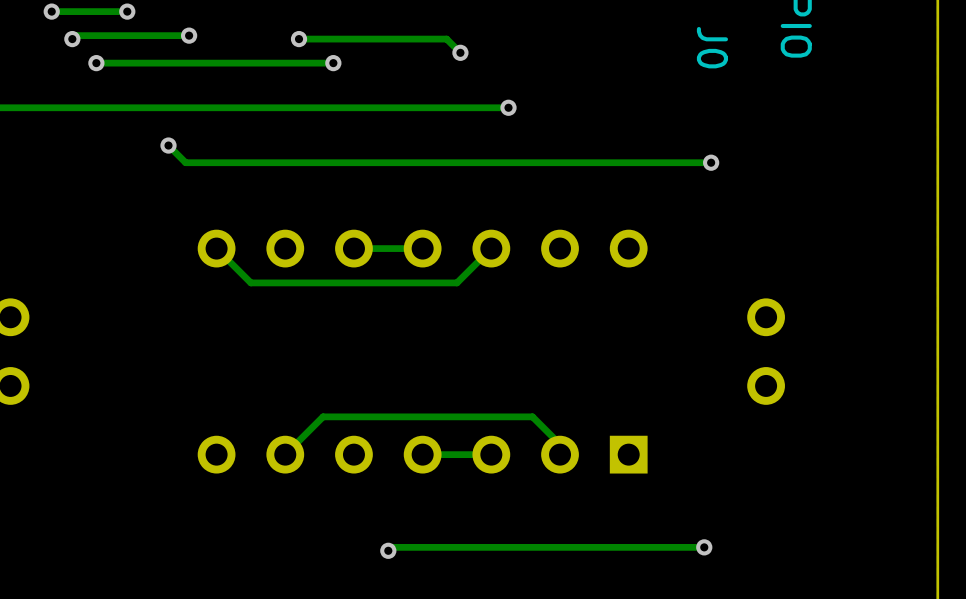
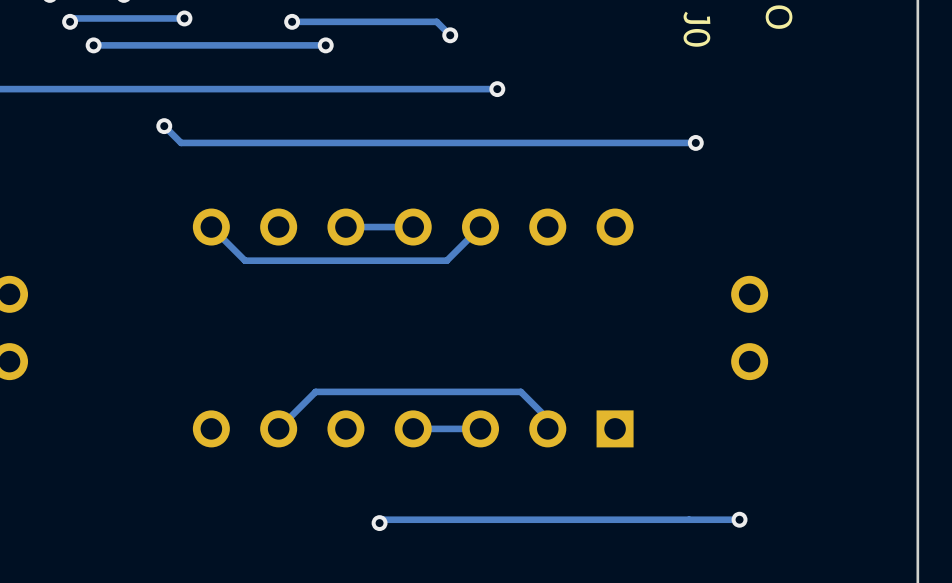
via position: (704, 547) -> (739, 519)
track: none -> (739, 519) (689, 519)

